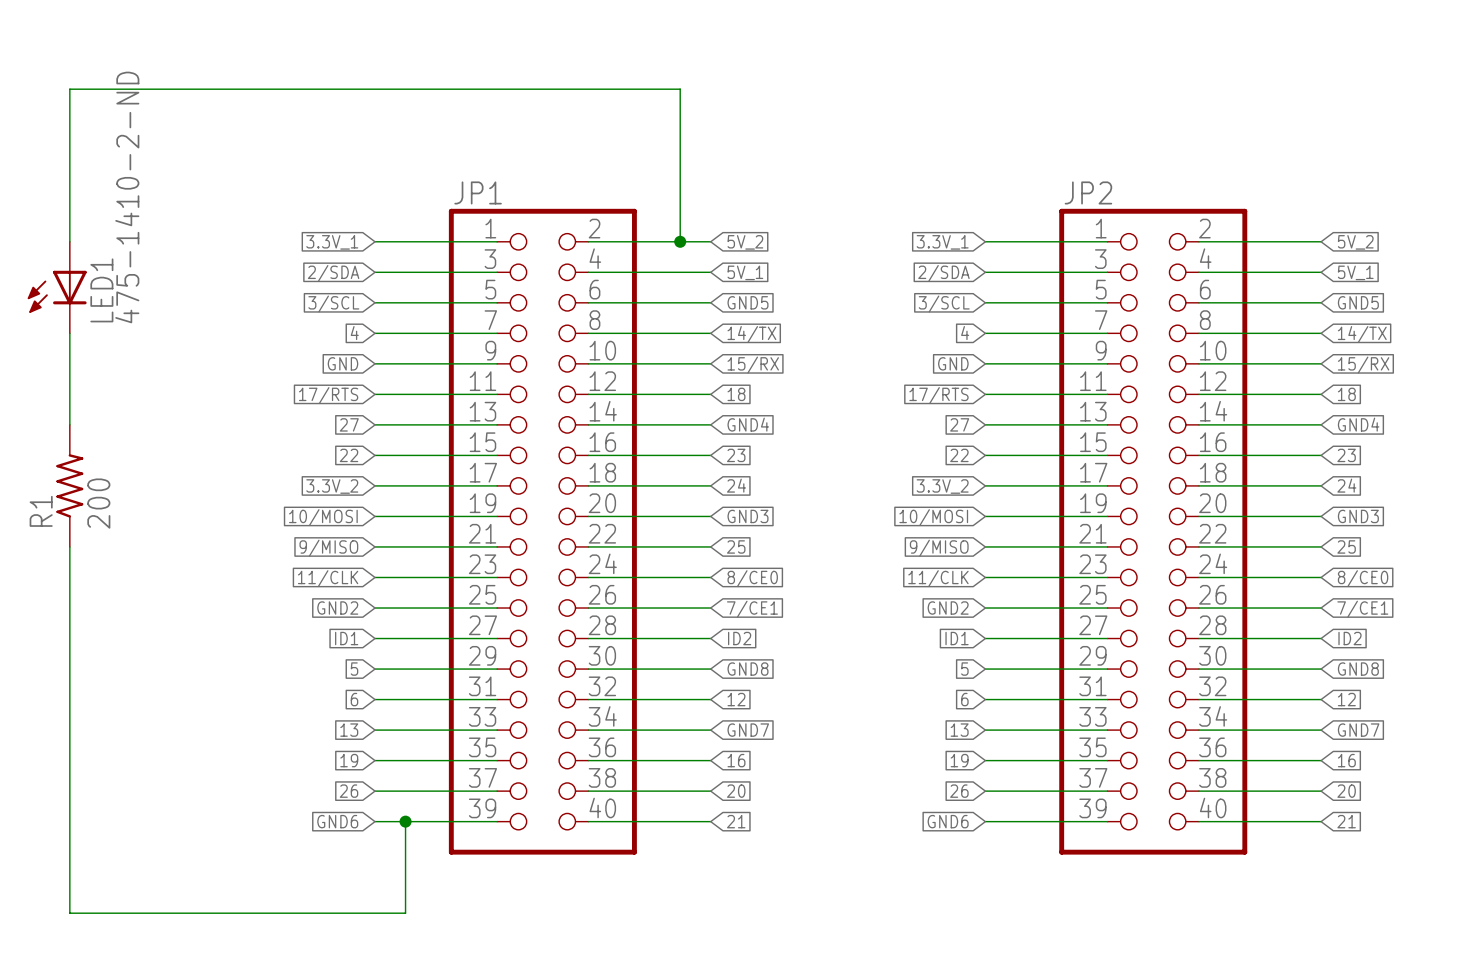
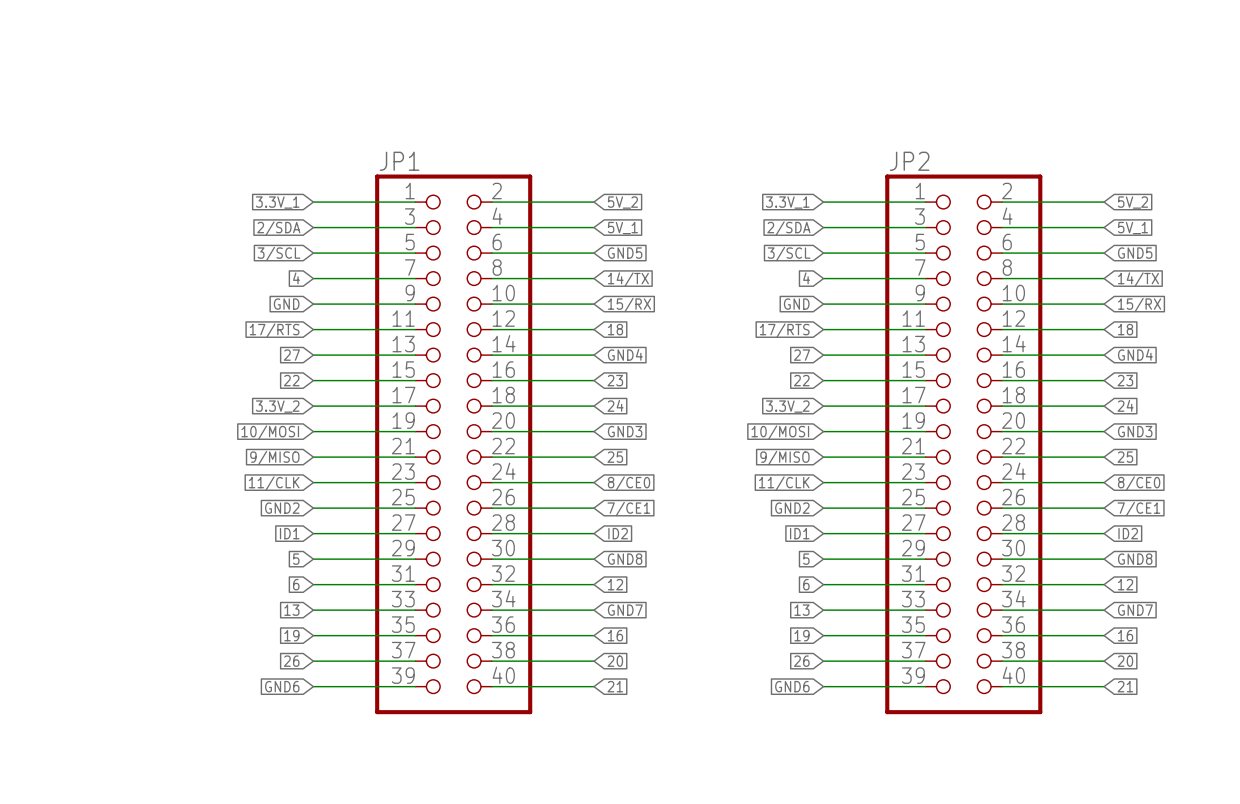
wire: (69, 241) (69, 89) (680, 89) (680, 241) -> none
junction: (680, 241) -> none
LED1: 475-1410-2-ND (57, 287) -> none
wire: (69, 333) (69, 424) -> none
R1: 200 (69, 485) -> none
wire: (69, 546) (69, 913) (405, 913) (405, 821) -> none
junction: (405, 821) -> none

